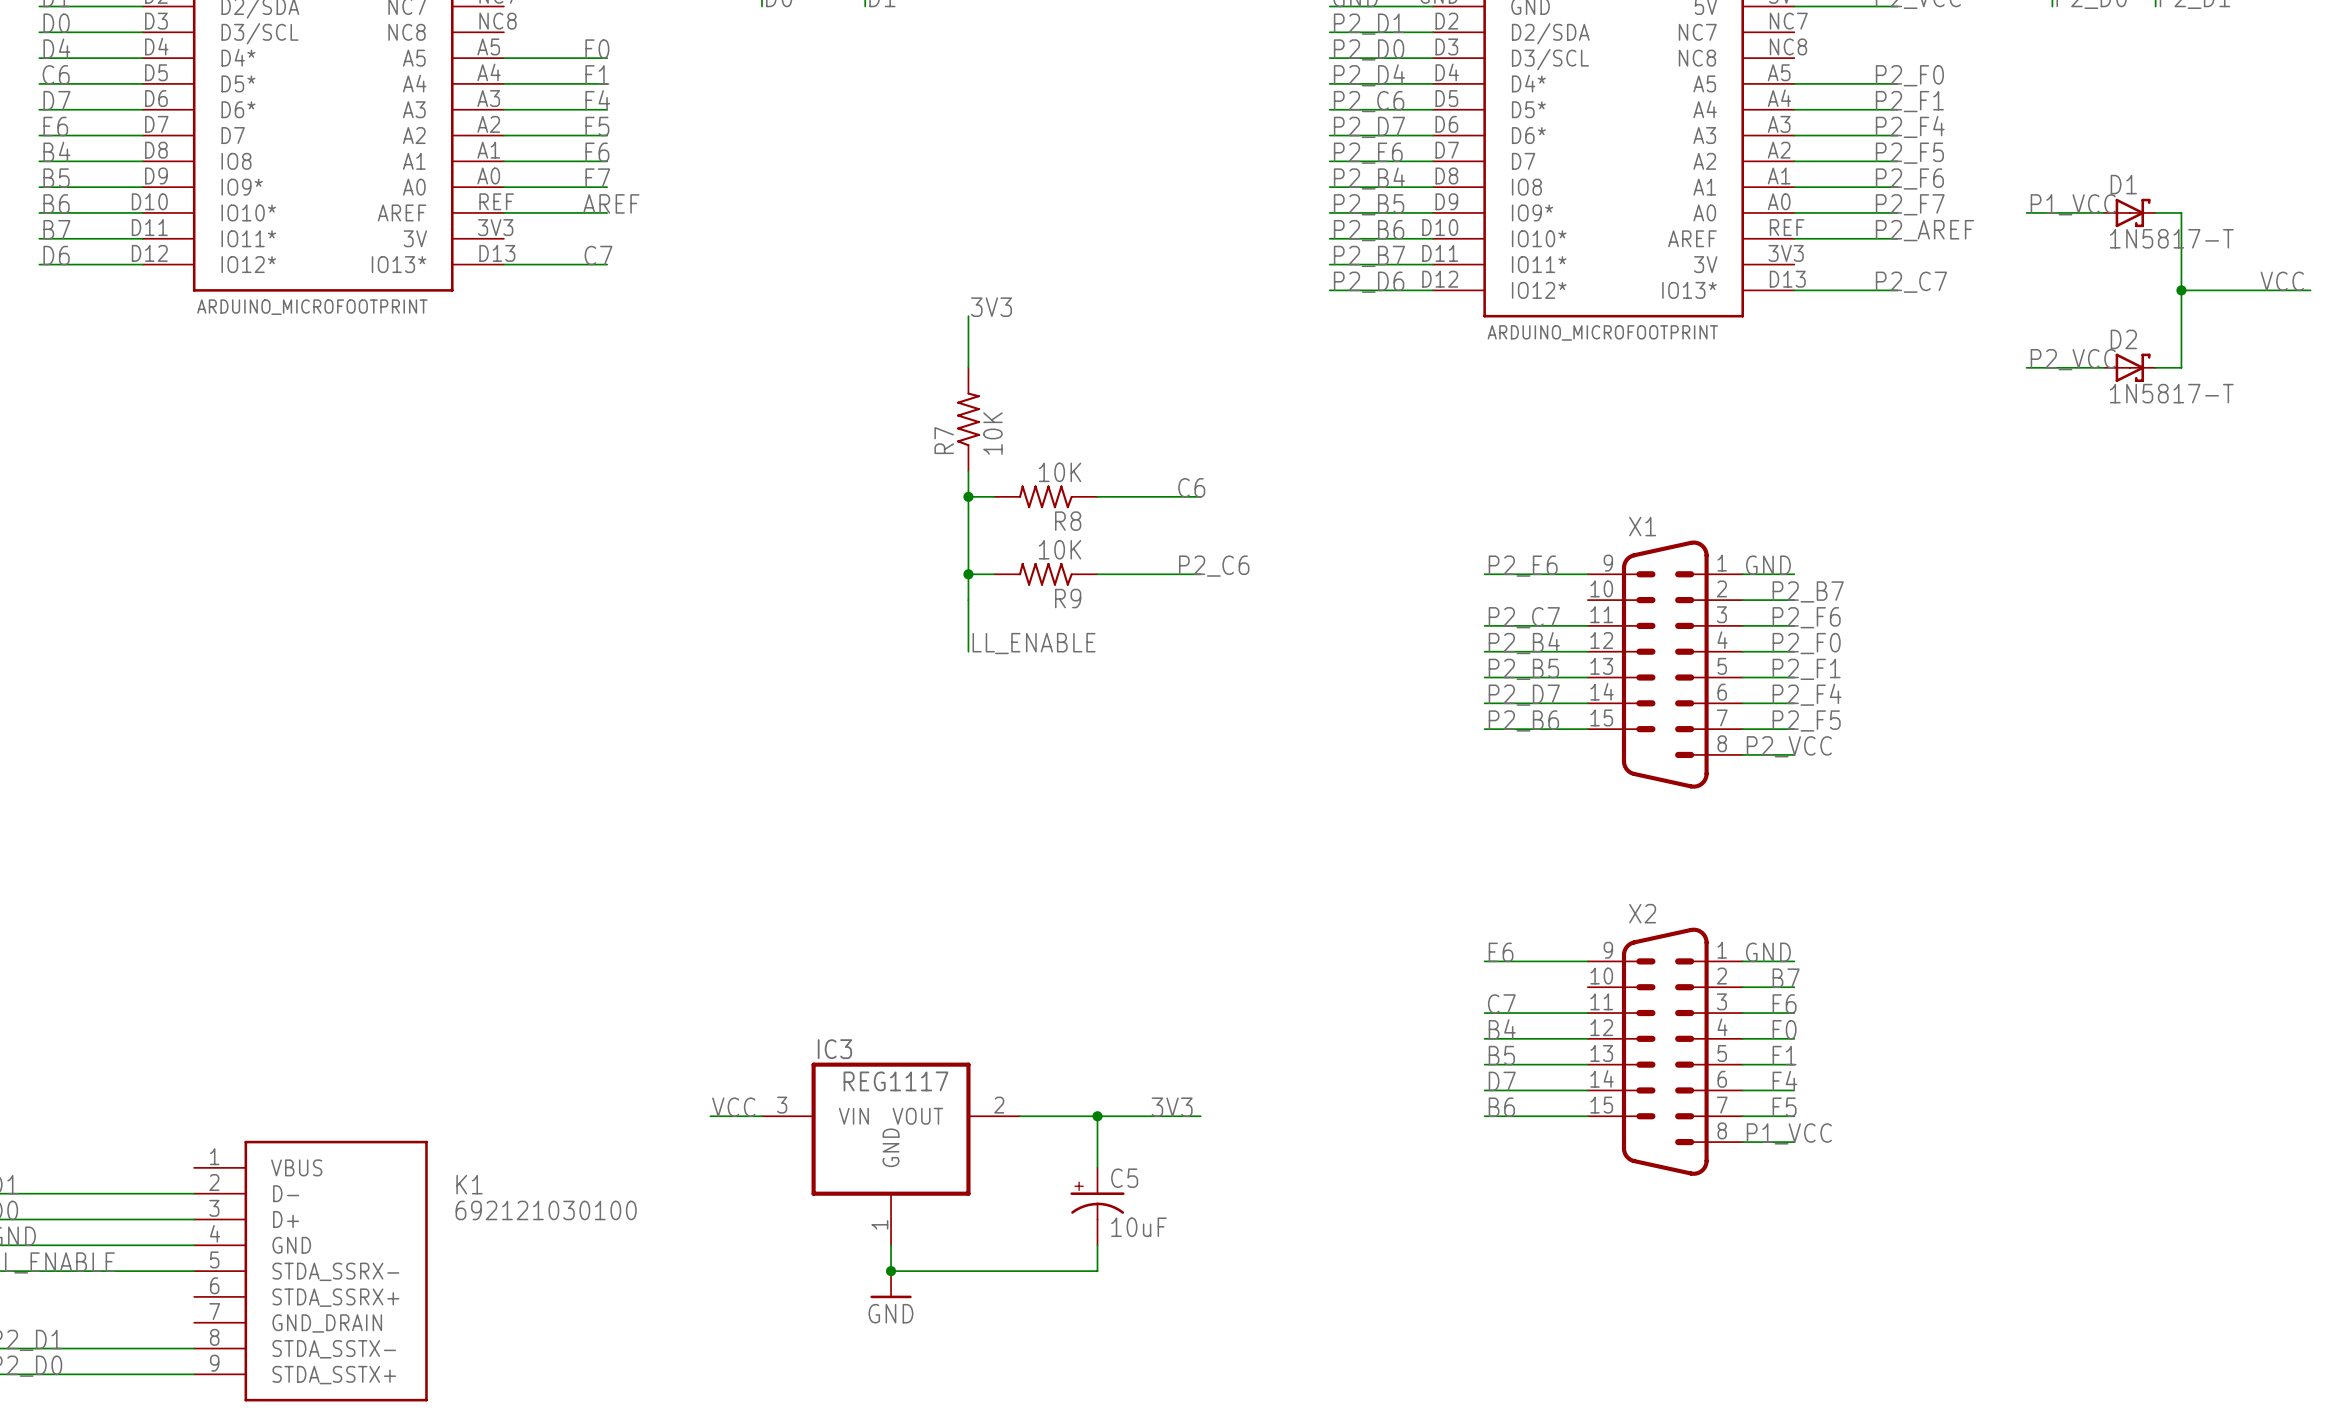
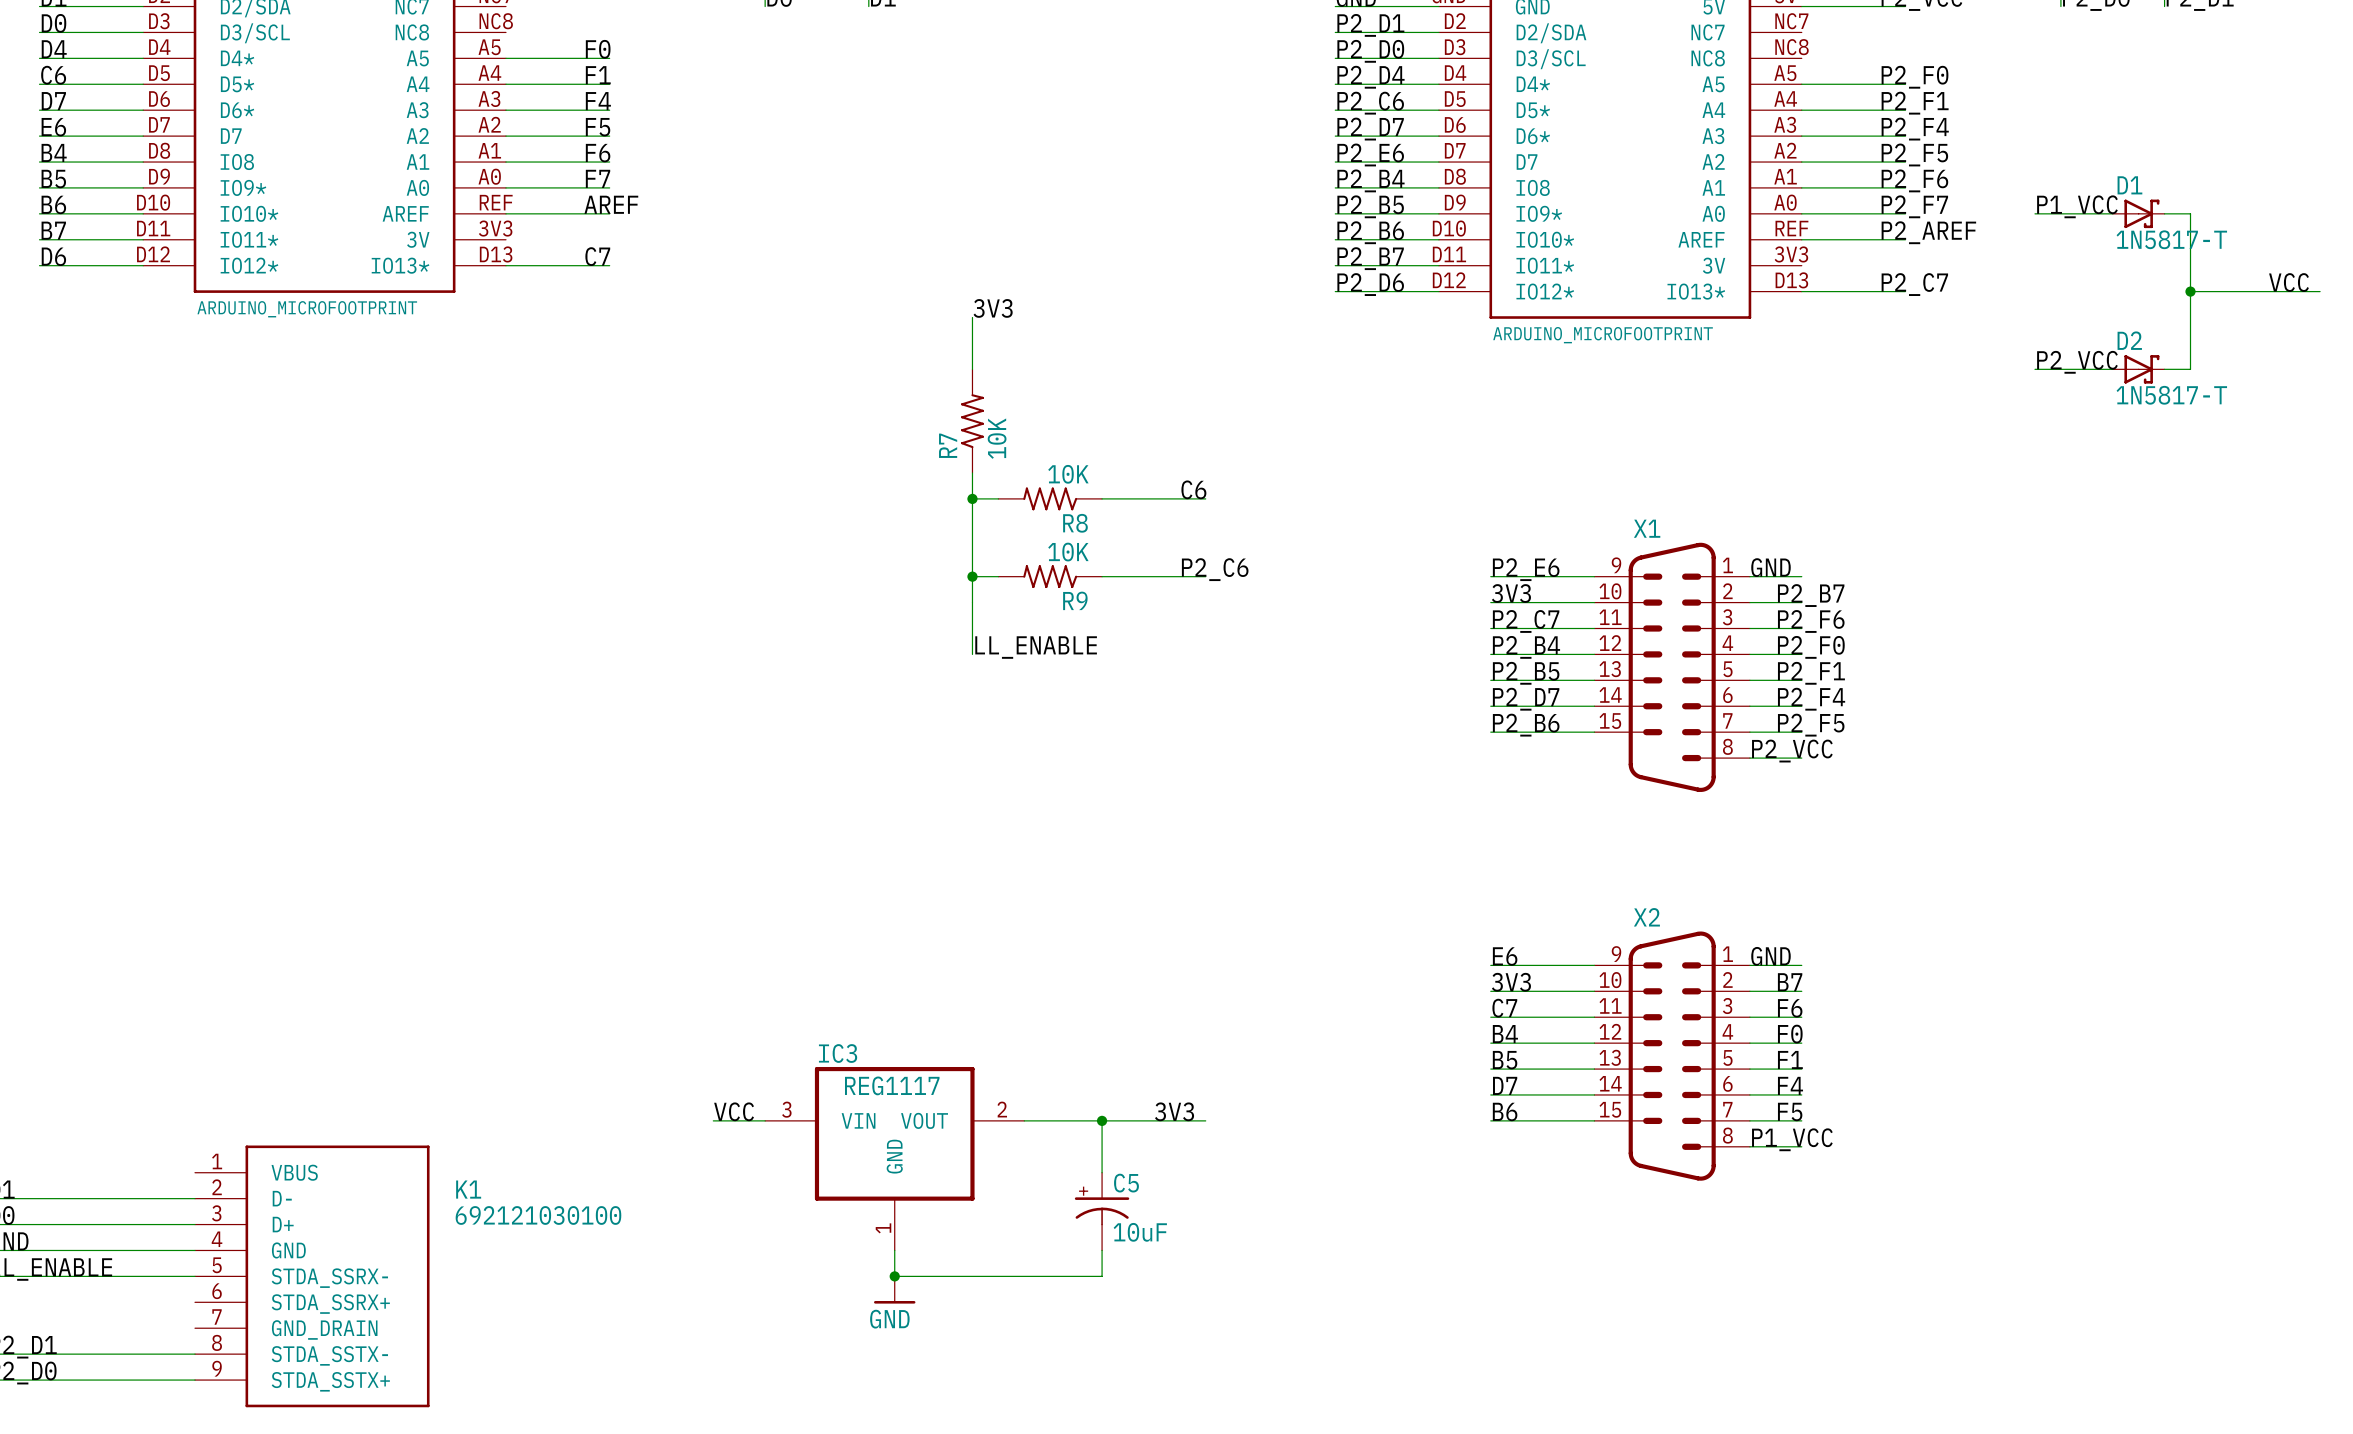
label: none -> 3V3 (1511, 593)
wire: none -> (1490, 602) (1594, 602)
label: none -> 3V3 (1511, 982)
wire: none -> (1490, 991) (1594, 991)

